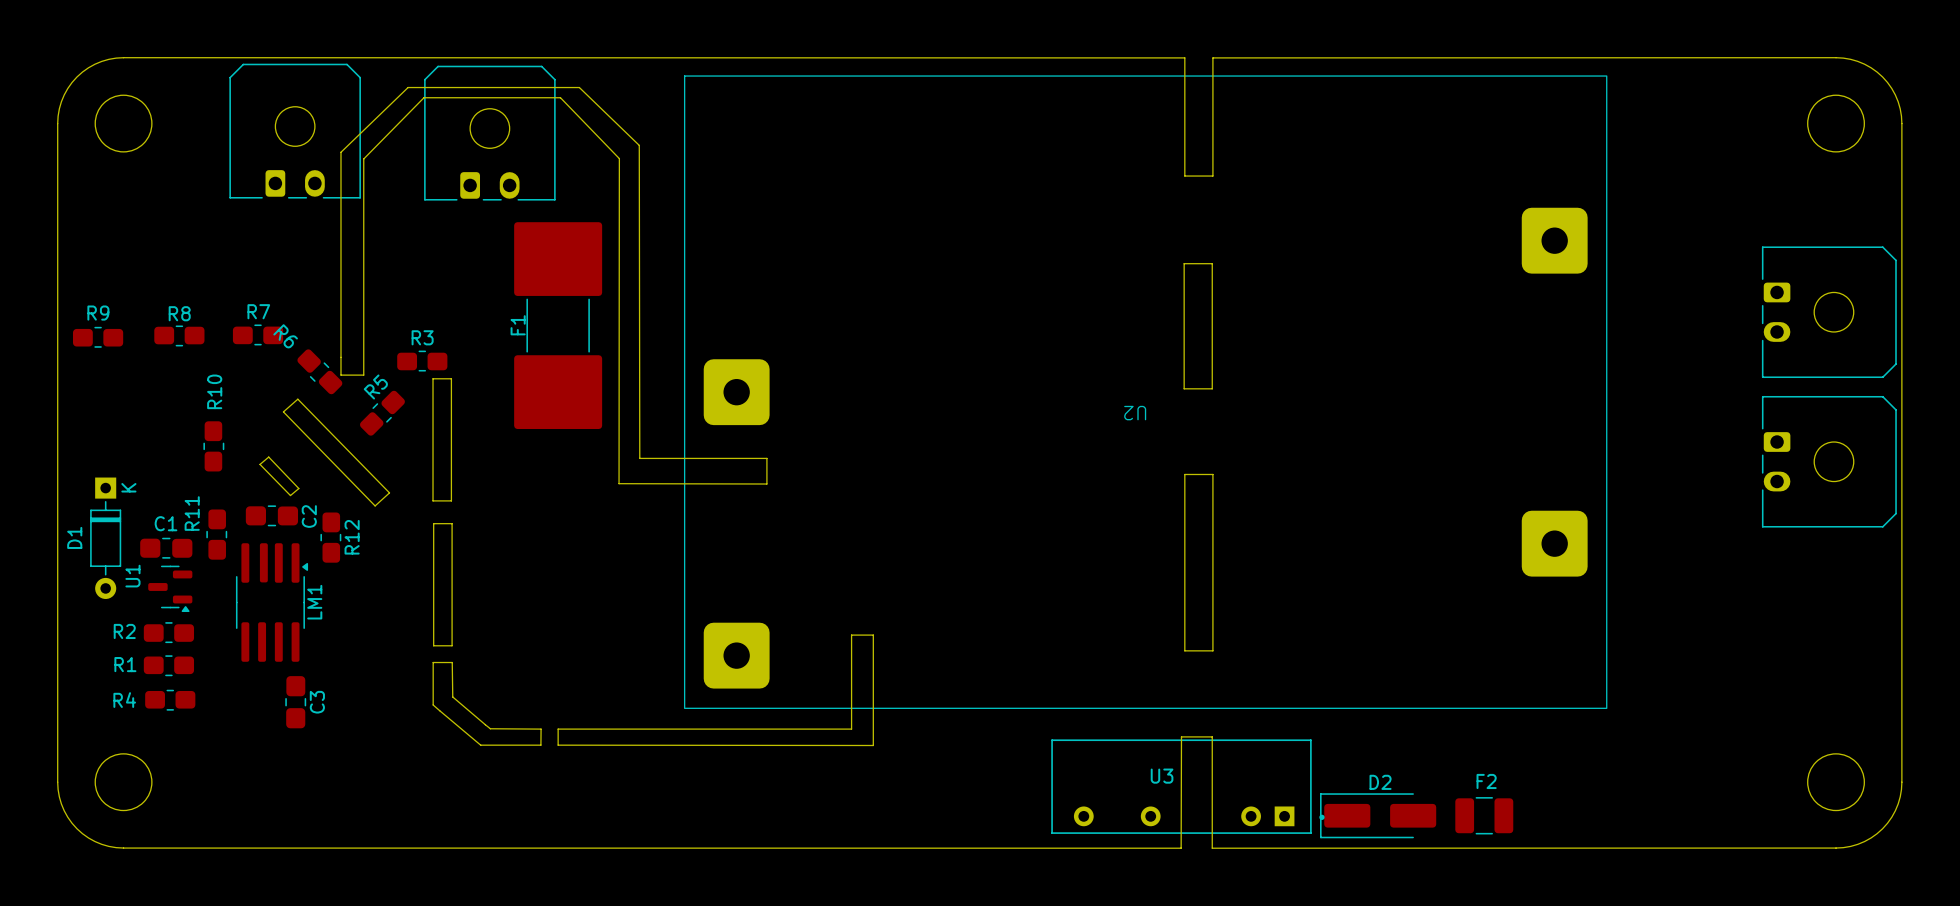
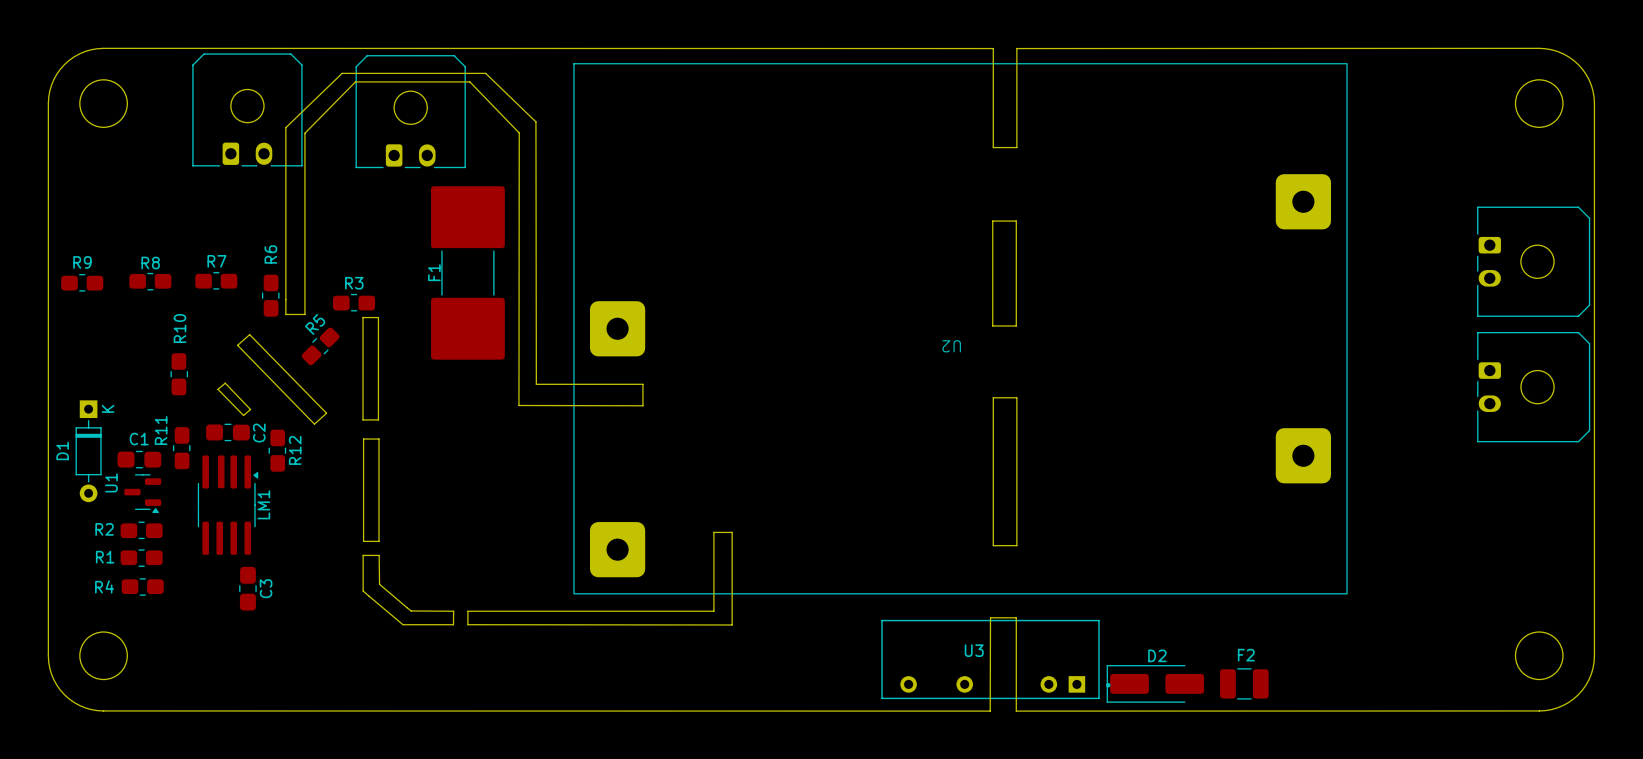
R6 rotation: 0° (319, 371) -> 45° clockwise (270, 295)

